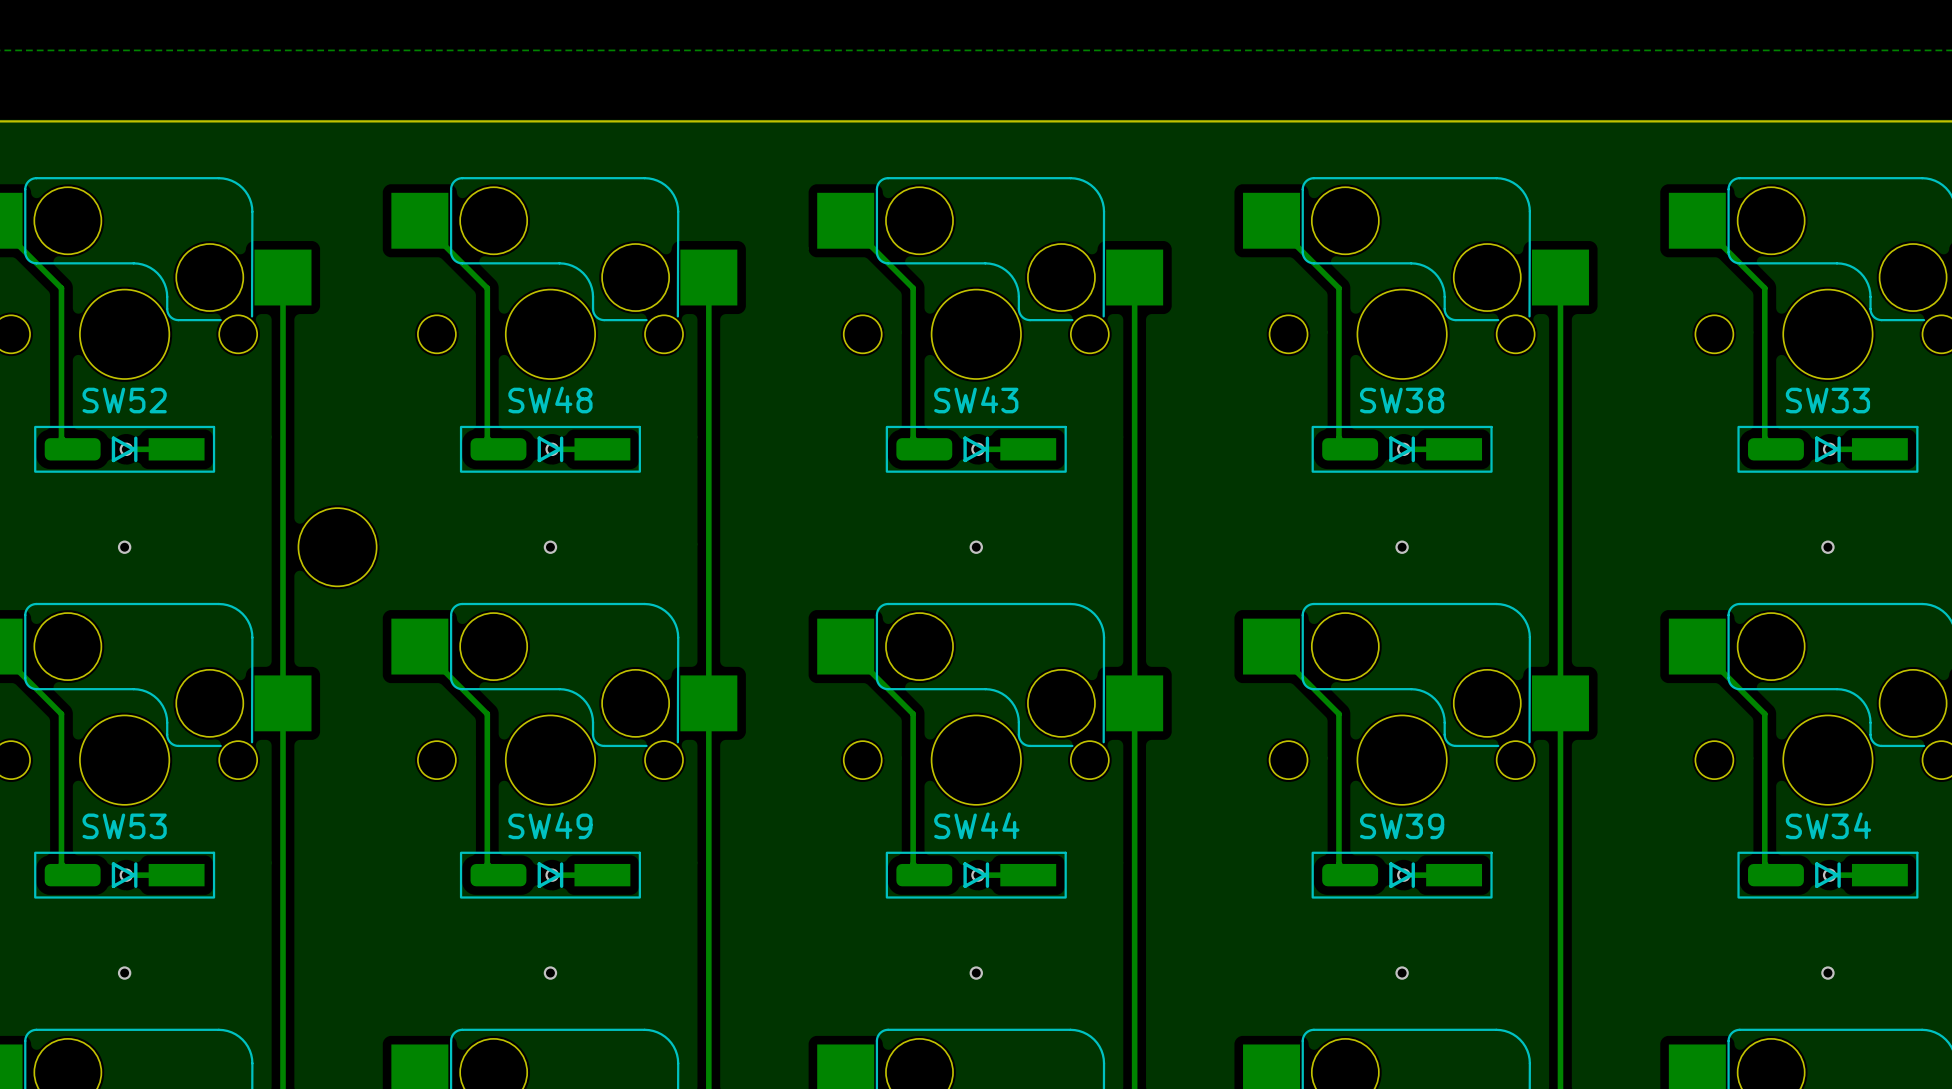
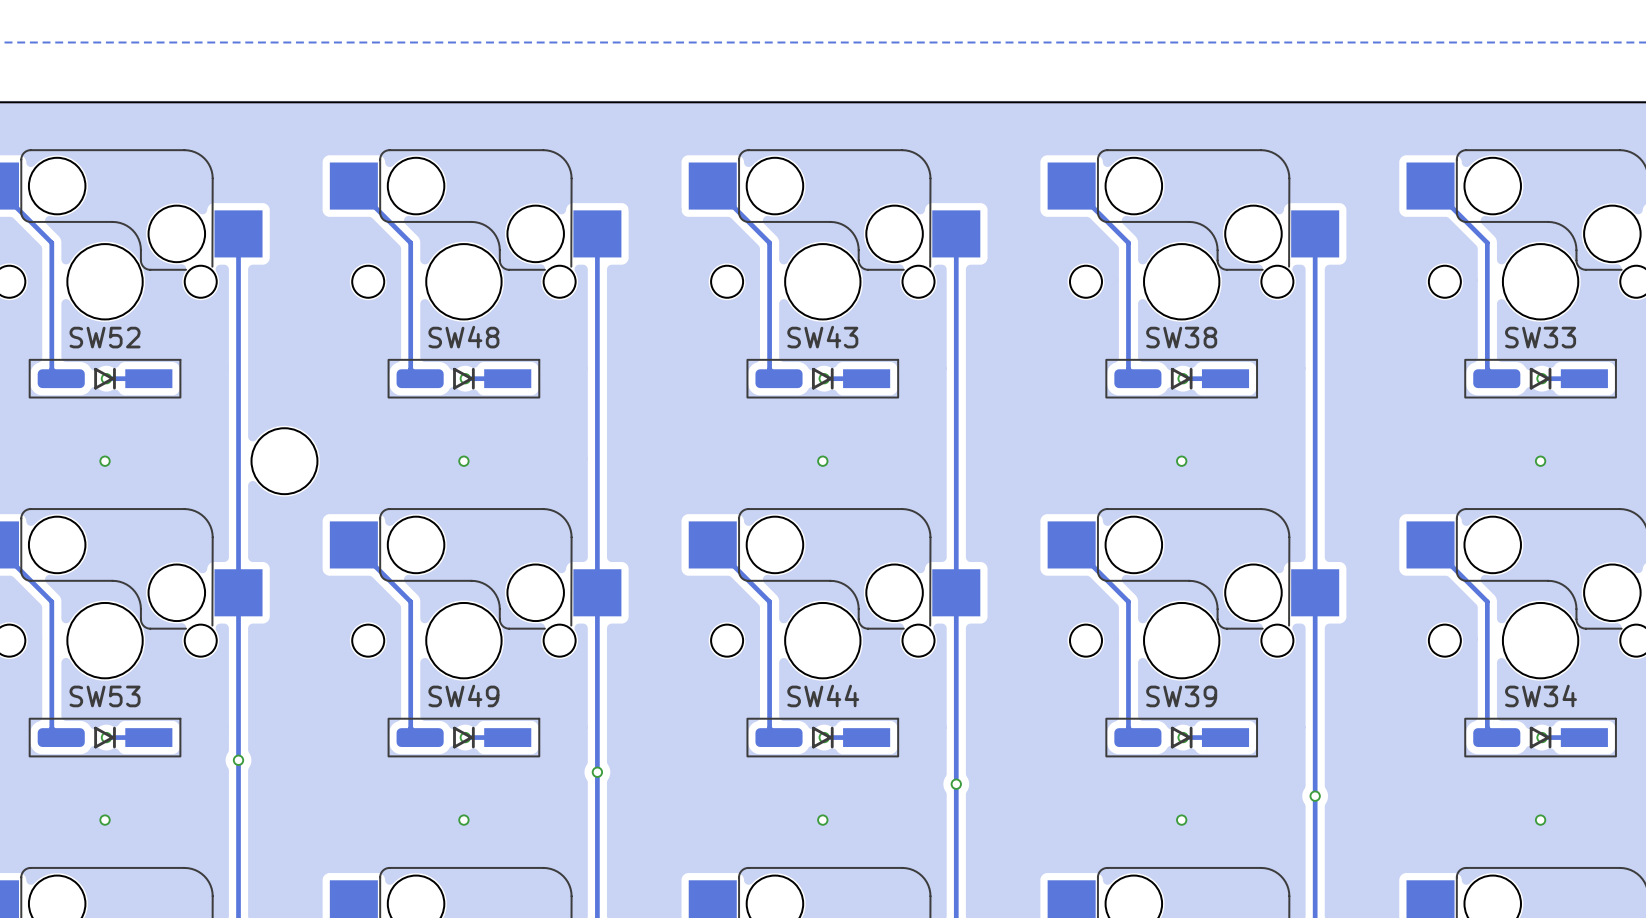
via: none -> (238, 760)
via: none -> (597, 772)
via: none -> (956, 784)
via: none -> (1315, 796)

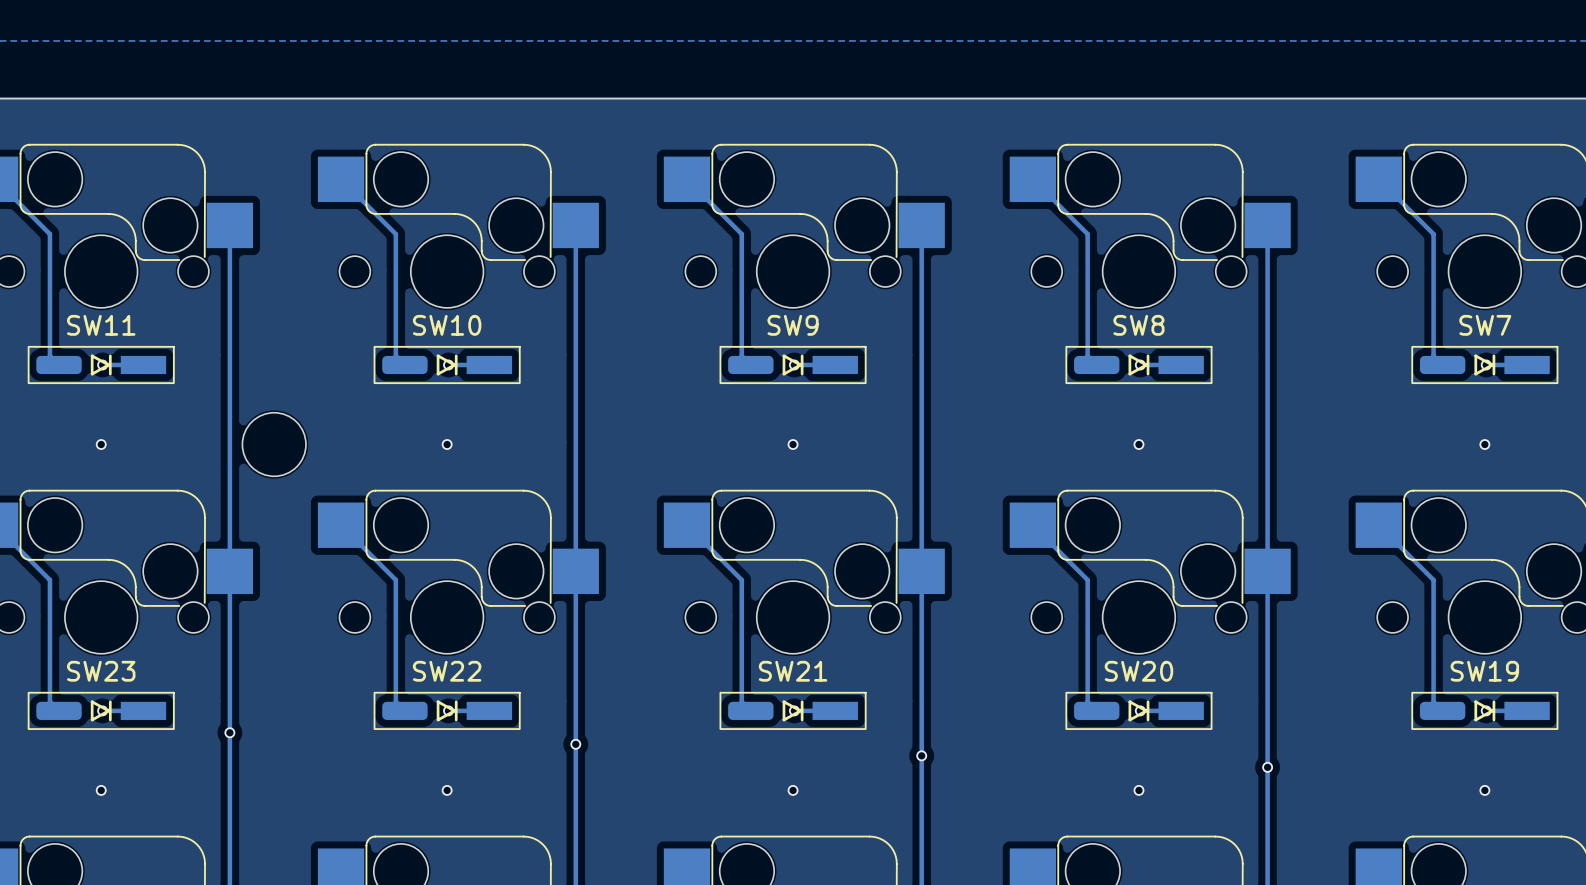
SW52 name: SW52 (105, 337) -> SW11 (101, 325)
SW48 name: SW48 (463, 337) -> SW10 (447, 325)
SW43 name: SW43 (822, 337) -> SW9 (793, 325)
SW38 name: SW38 (1181, 337) -> SW8 (1138, 325)
SW33 name: SW33 (1540, 337) -> SW7 (1485, 325)
SW53 name: SW53 (105, 696) -> SW23 (101, 671)
SW49 name: SW49 (463, 696) -> SW22 (447, 671)
SW44 name: SW44 (823, 696) -> SW21 (793, 671)
SW39 name: SW39 (1181, 696) -> SW20 (1138, 671)
SW34 name: SW34 (1541, 696) -> SW19 (1484, 671)

